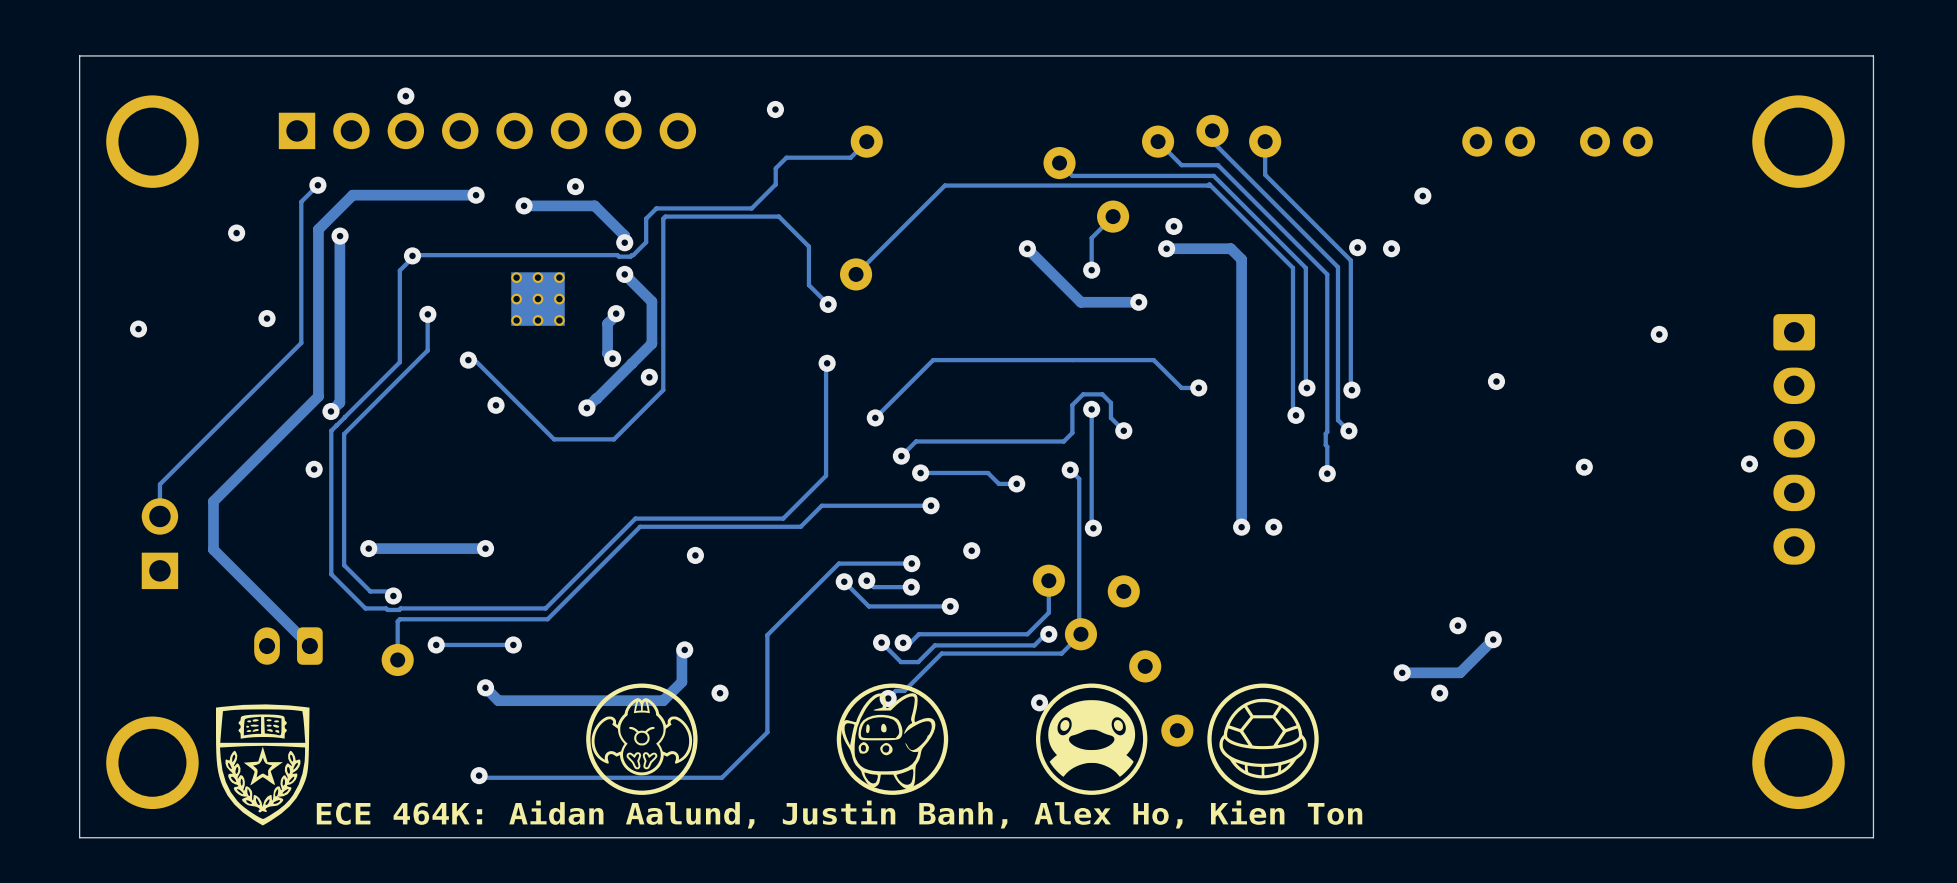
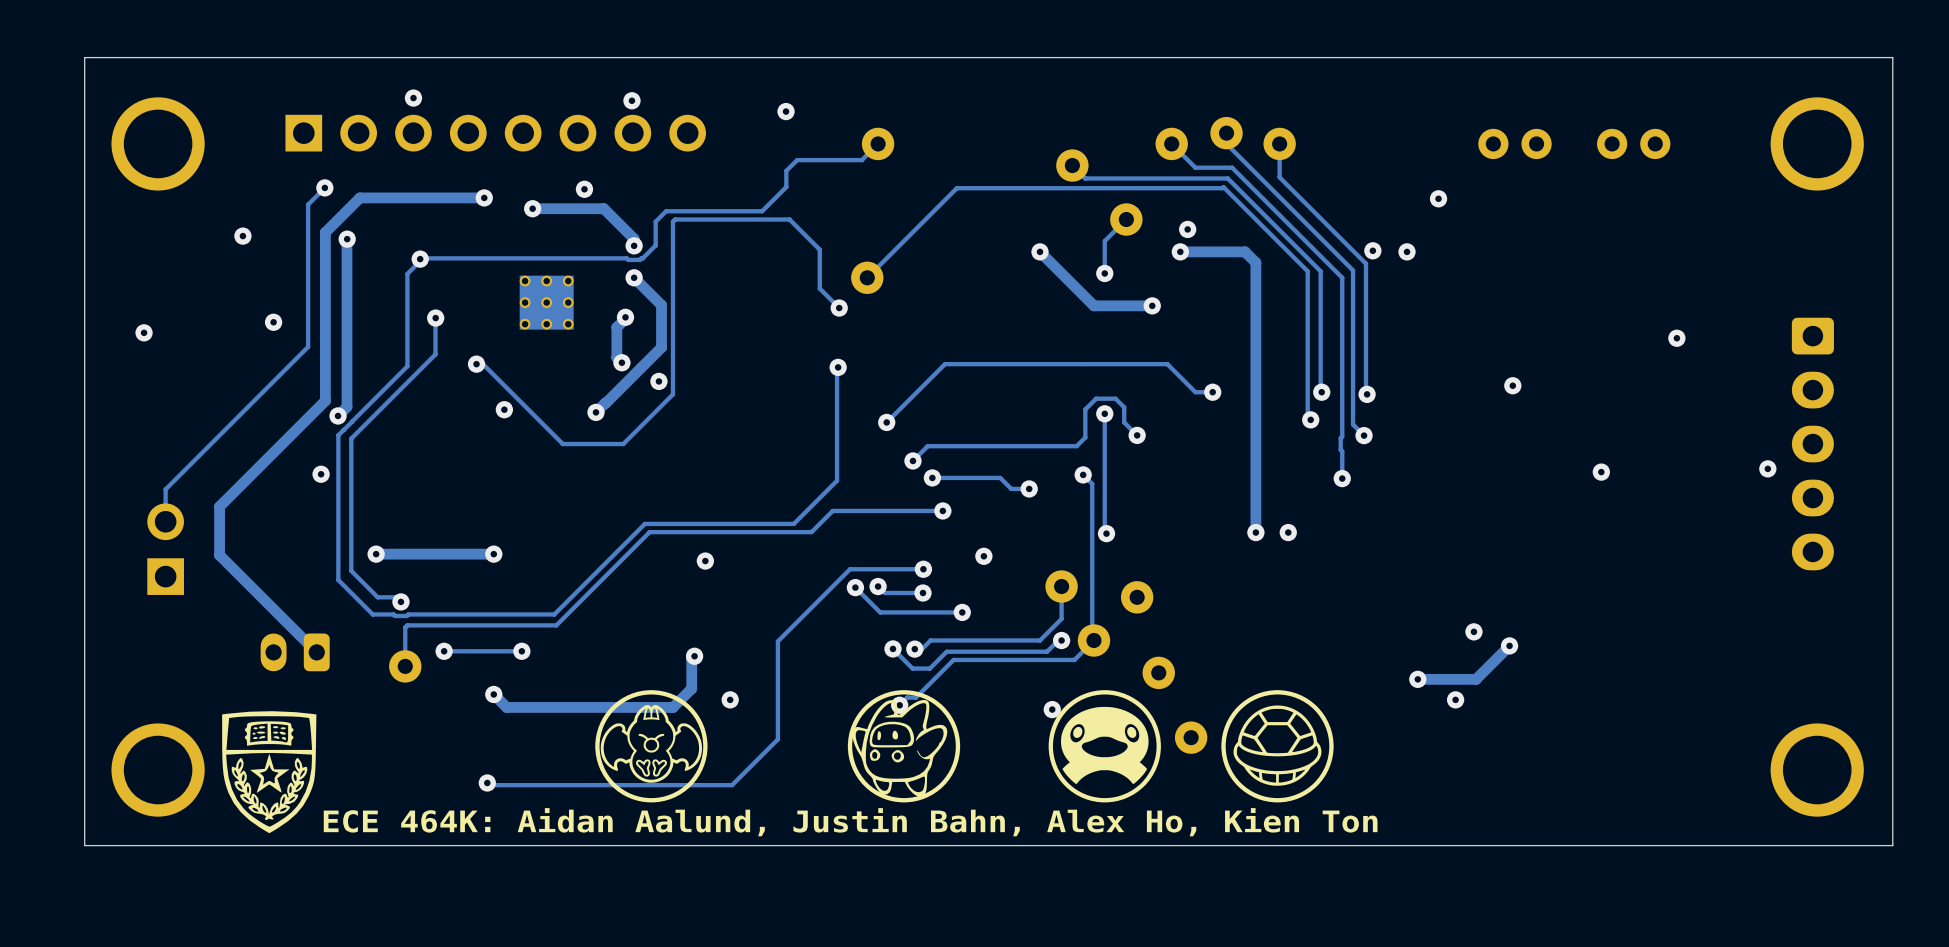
text: ECE 464K: Aidan Aalund, Justin Banh, Alex Ho, Kien Ton (839, 814) -> ECE 464K: Aidan Aalund, Justin Bahn, Alex Ho, Kien Ton (850, 822)

